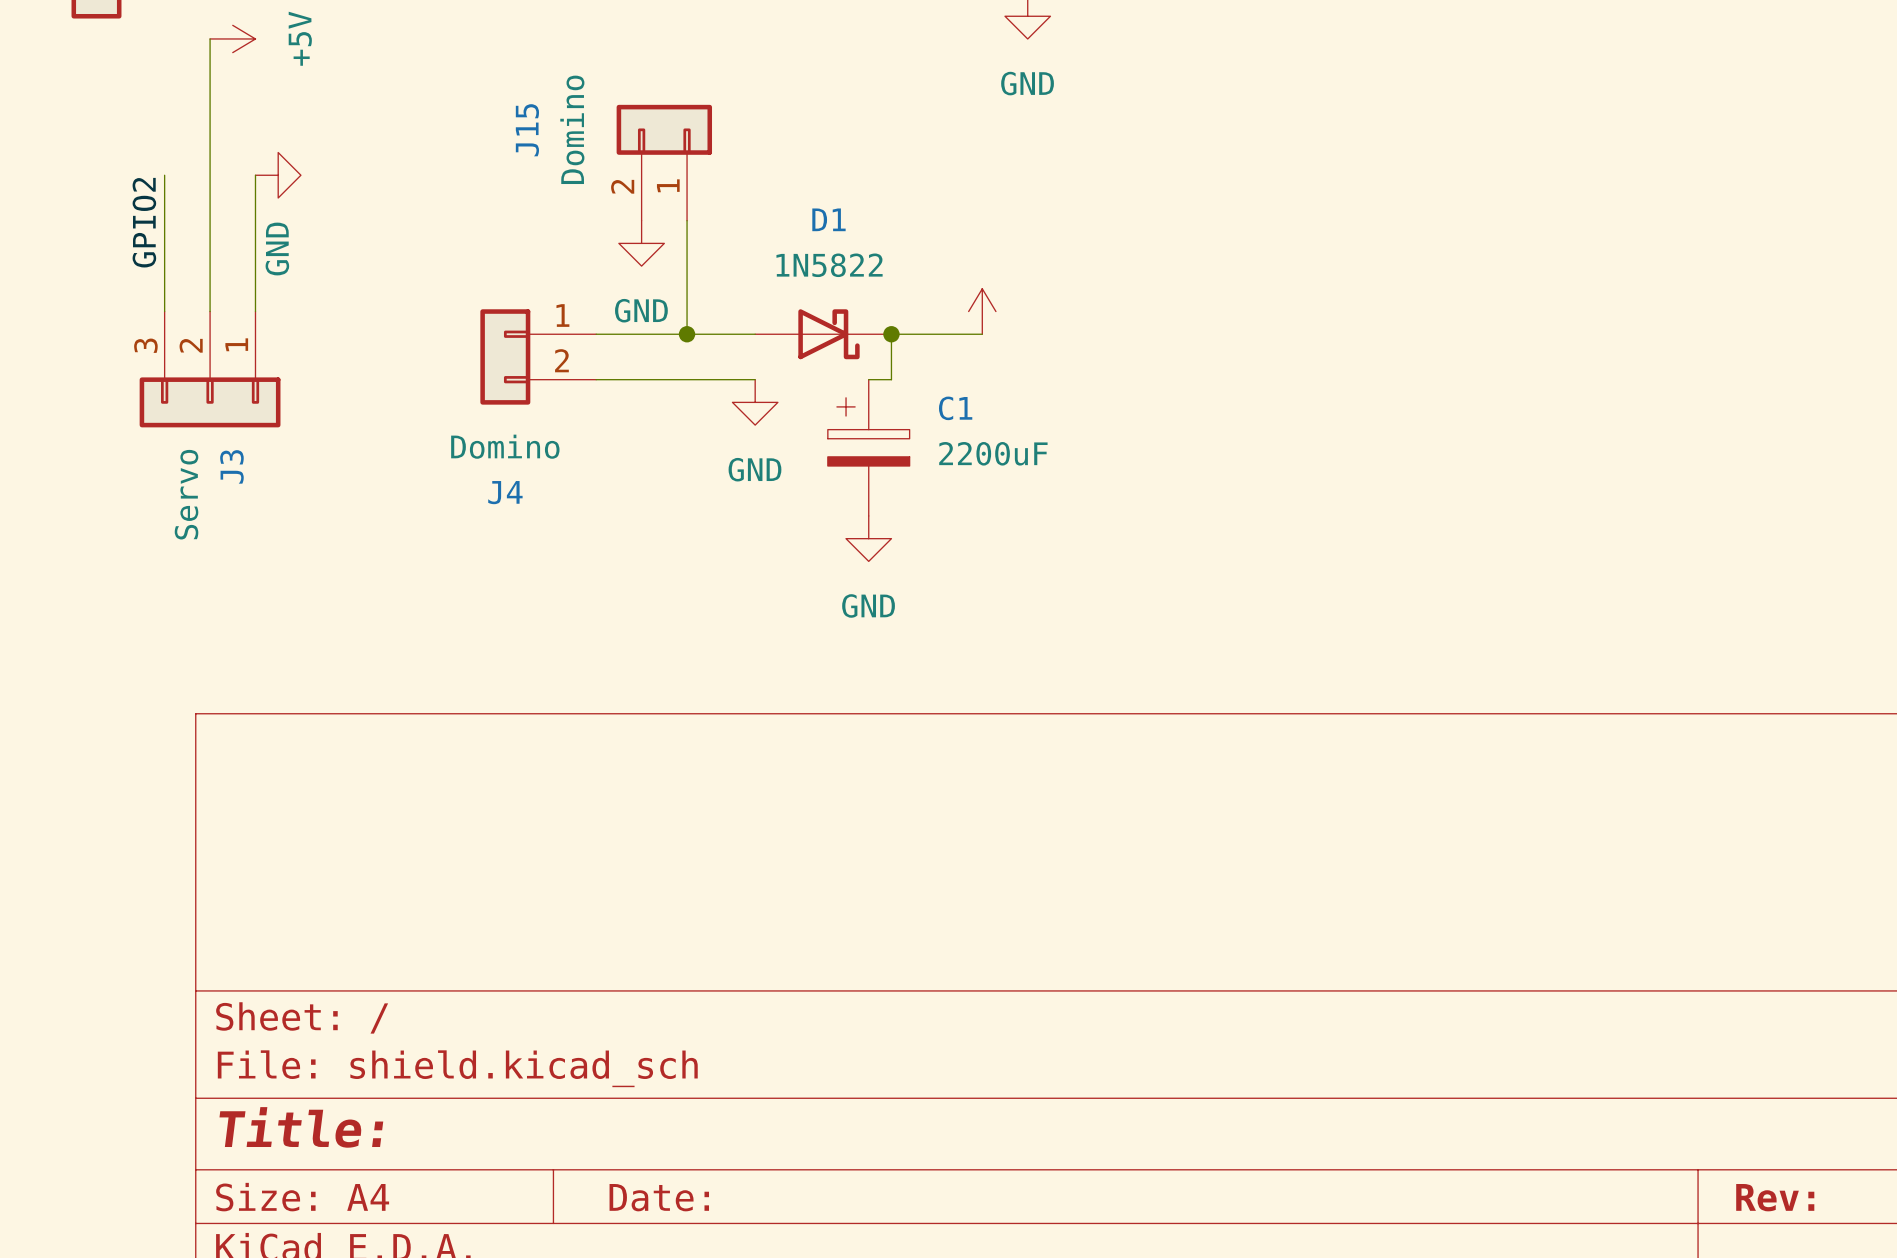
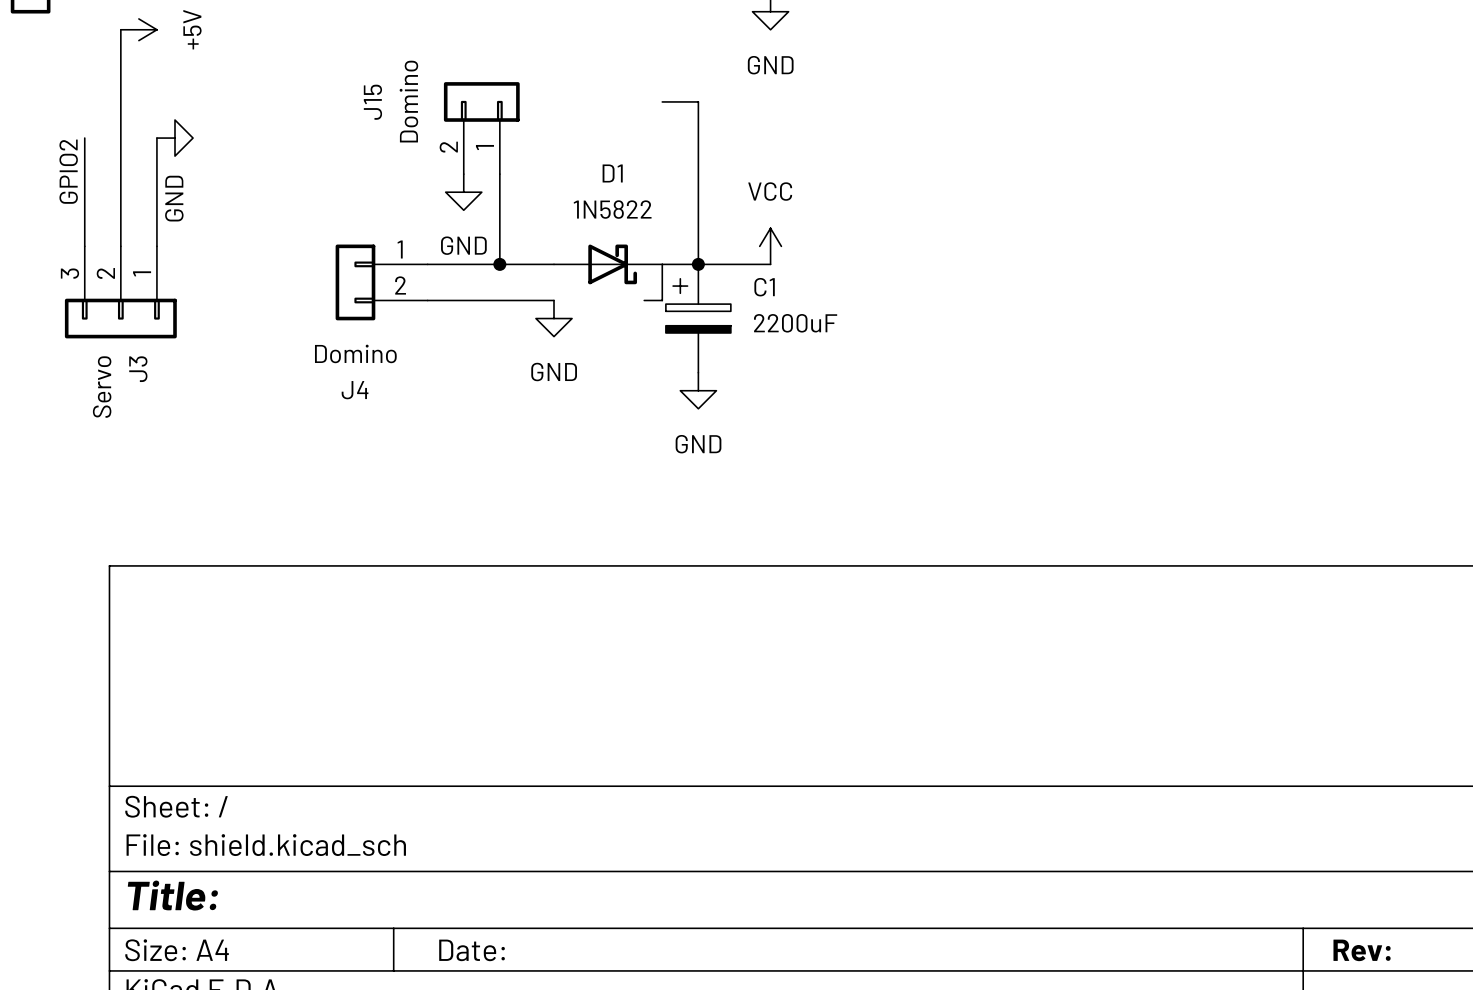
wire: none -> (662, 101) (698, 101) (698, 264)
power symbol: (982, 311) -> none
power symbol: none -> VCC (770, 246)
junction position: (891, 334) -> (698, 264)
wire: none -> (734, 264) (770, 264)
C1 position: (868, 447) -> (698, 318)
power symbol position: GND (868, 538) -> GND (698, 390)

